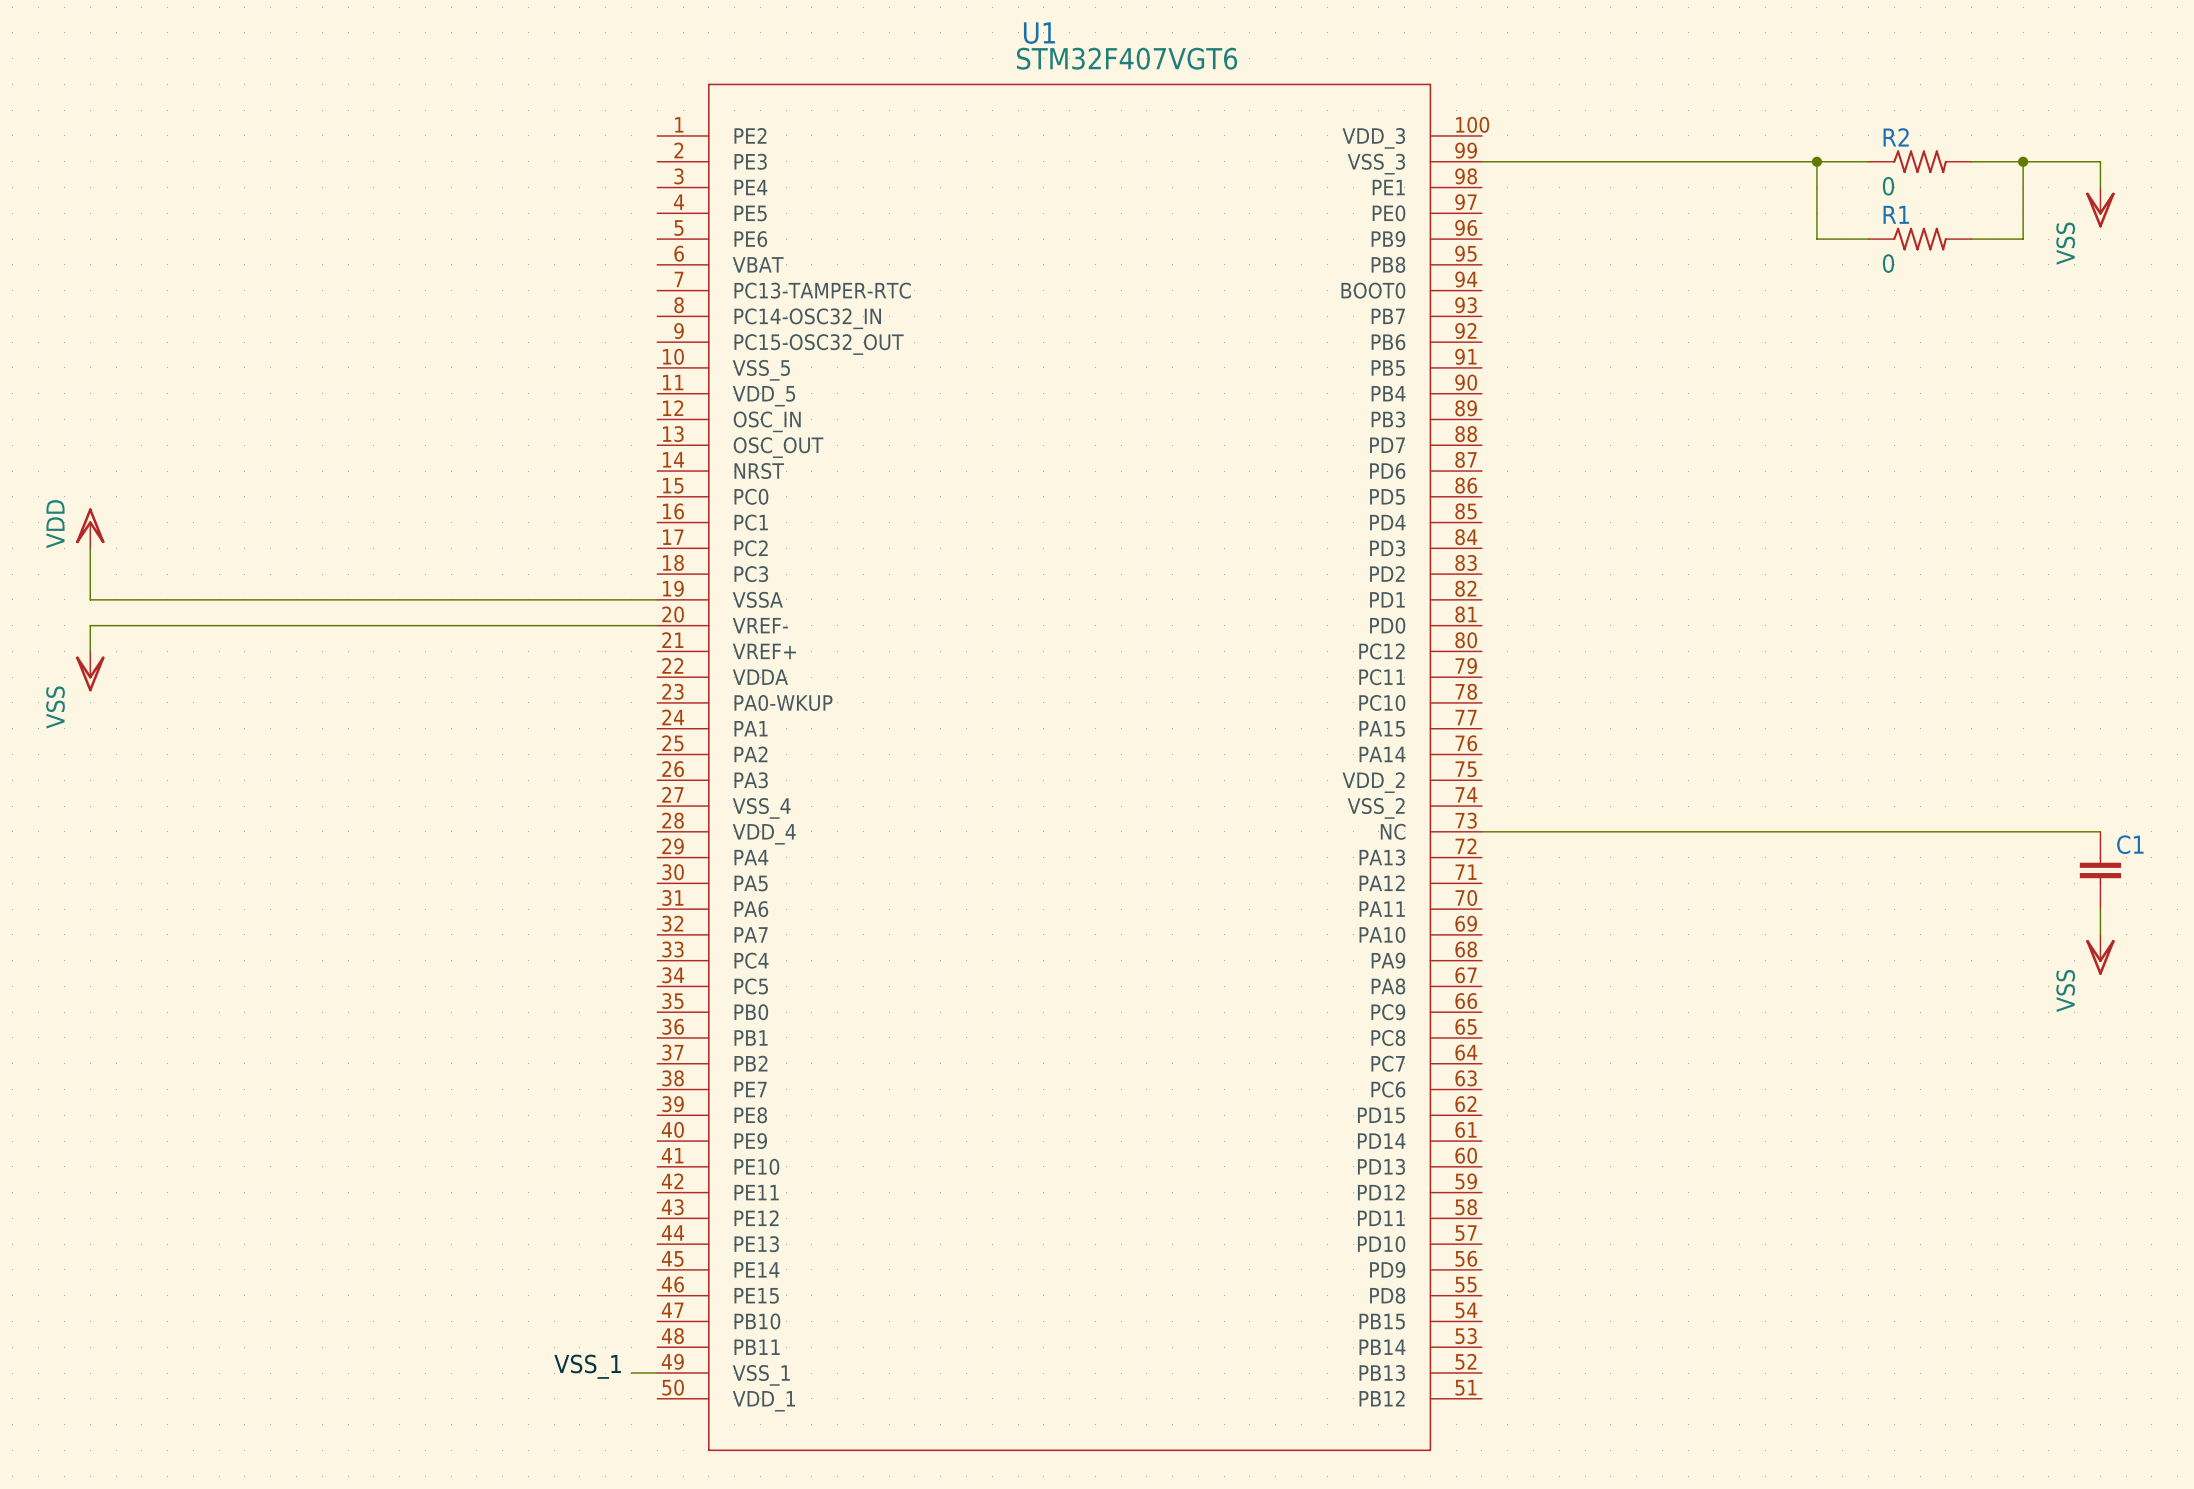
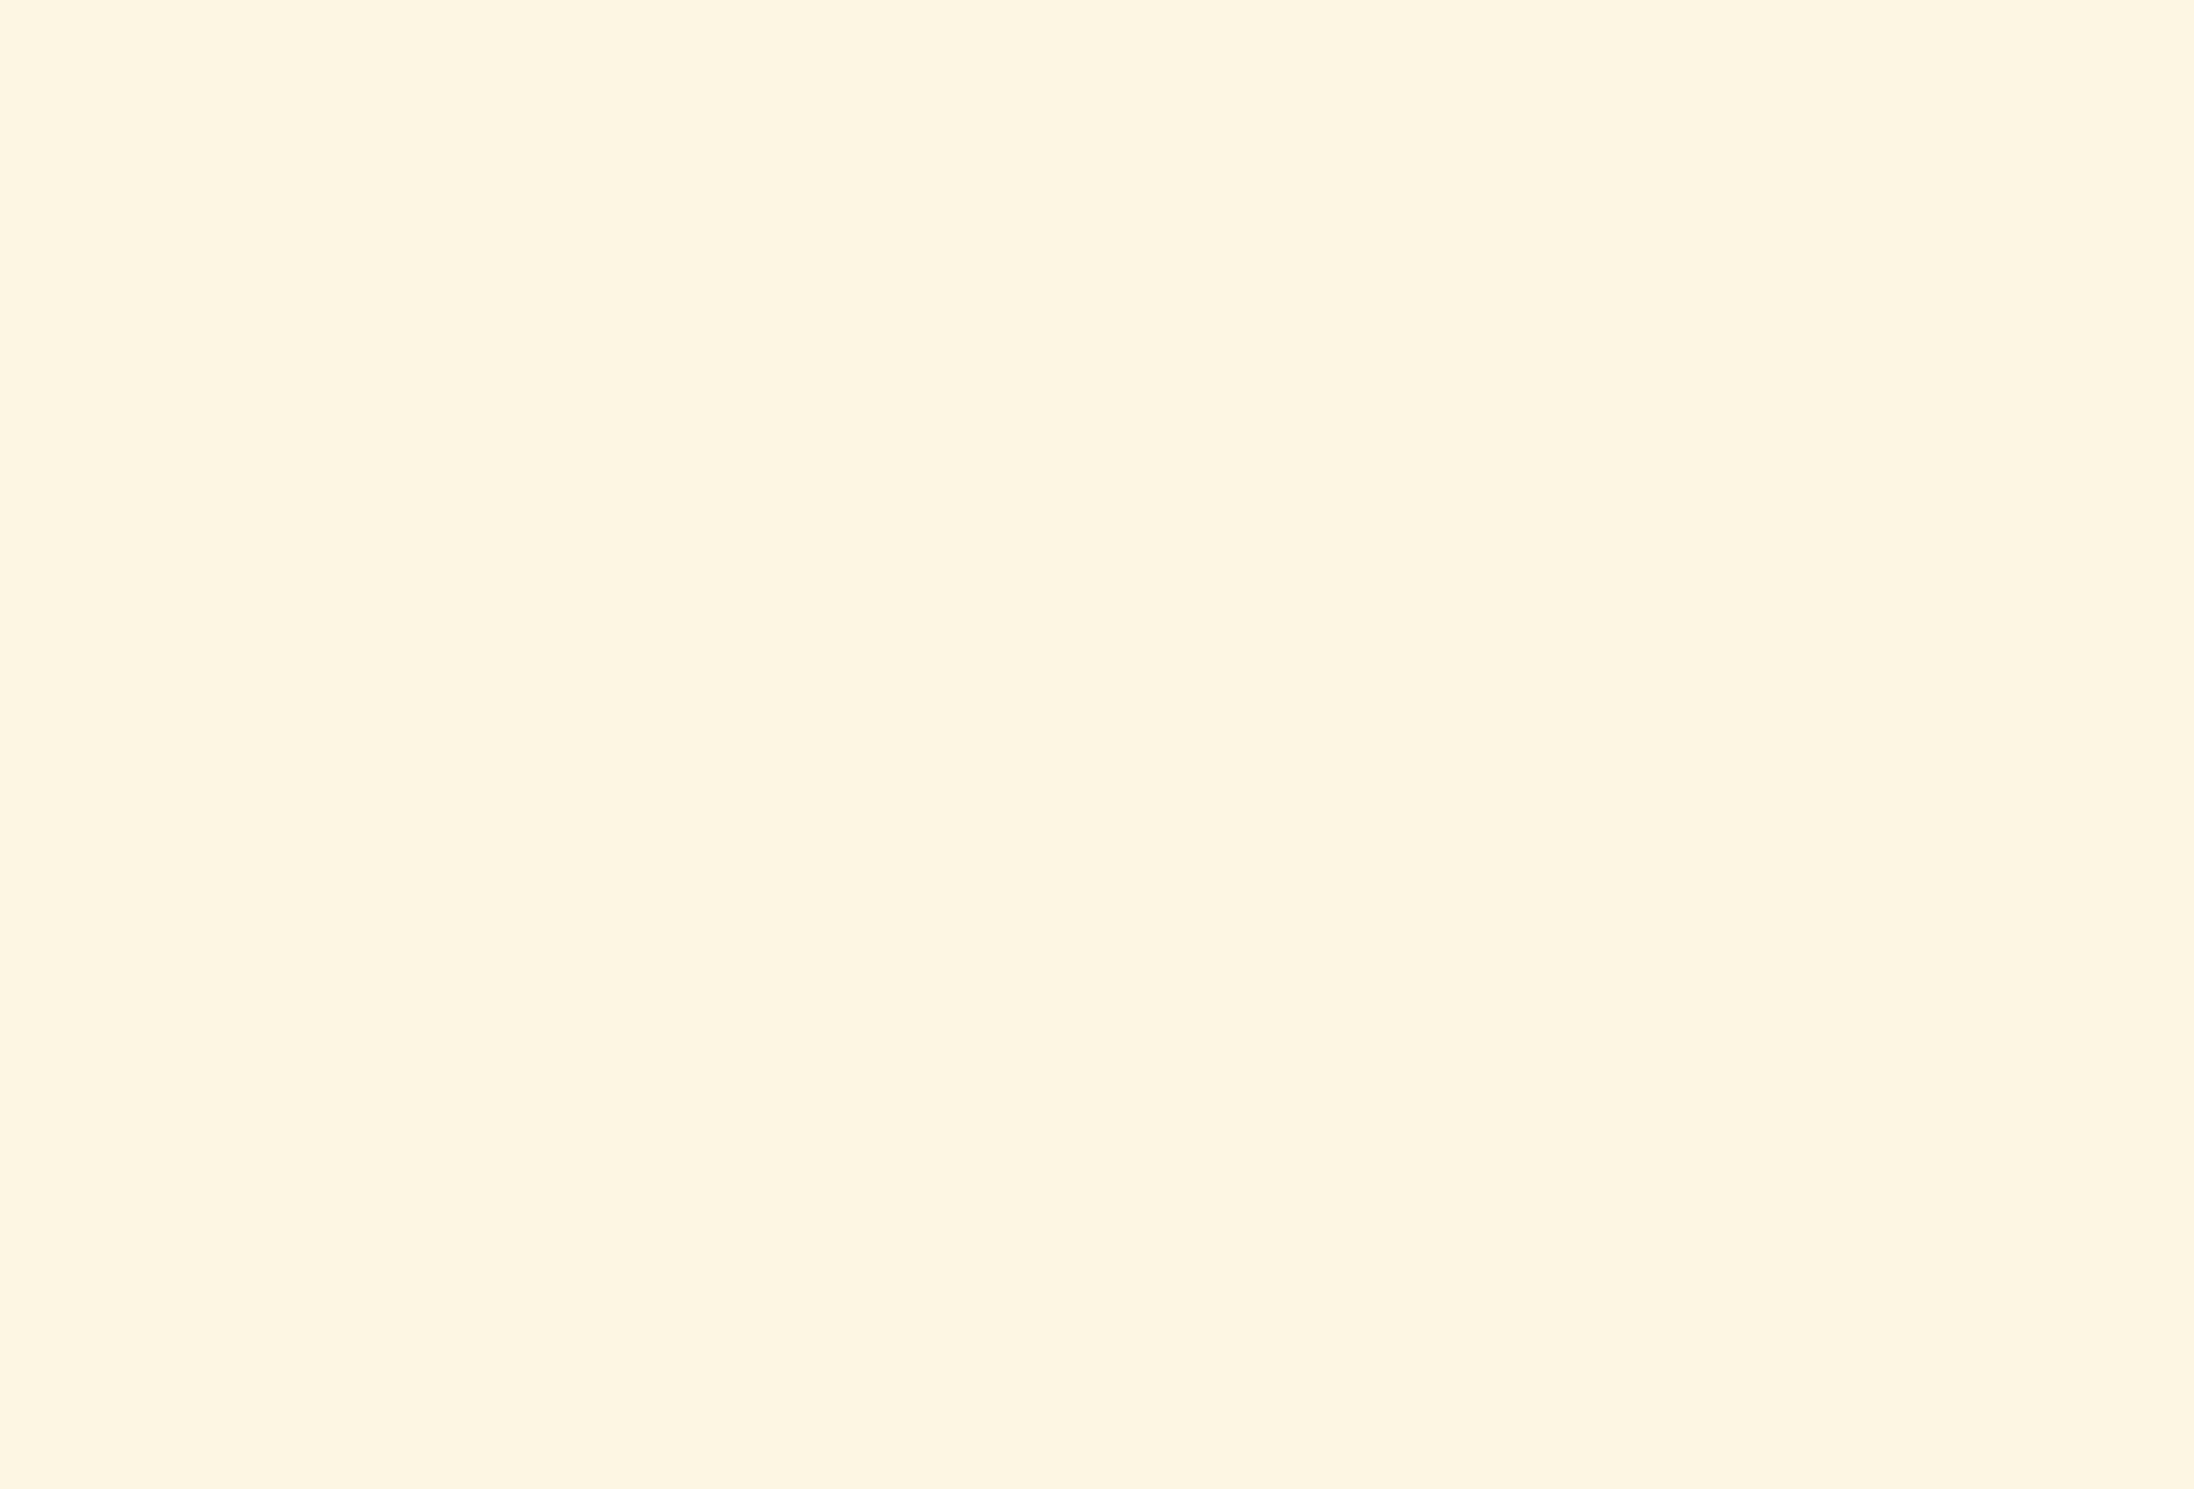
wire: (1481, 161) (1868, 161) -> none
wire: (1816, 161) (1816, 239) (1868, 239) -> none
junction: (1816, 161) -> none
R2: 0 (1920, 161) -> none
wire: (1971, 161) (2100, 161) (2100, 187) -> none
wire: (2023, 161) (2023, 239) (1971, 239) -> none
junction: (2023, 161) -> none
power symbol: VSS (2100, 207) -> none
R1: 0 (1920, 239) -> none
power symbol: VDD (90, 528) -> none
wire: (90, 548) (90, 599) (657, 599) -> none
wire: (657, 625) (90, 625) (90, 651) -> none
power symbol: VSS (90, 671) -> none
U1: STM32F407VGT6 (1069, 767) -> none
wire: (1481, 831) (2100, 831) -> none
C1: (2100, 870) -> none
wire: (2100, 909) (2100, 934) -> none
power symbol: VSS (2100, 954) -> none
label: VSS_1 (587, 1366) -> none
wire: (631, 1373) (657, 1373) -> none

